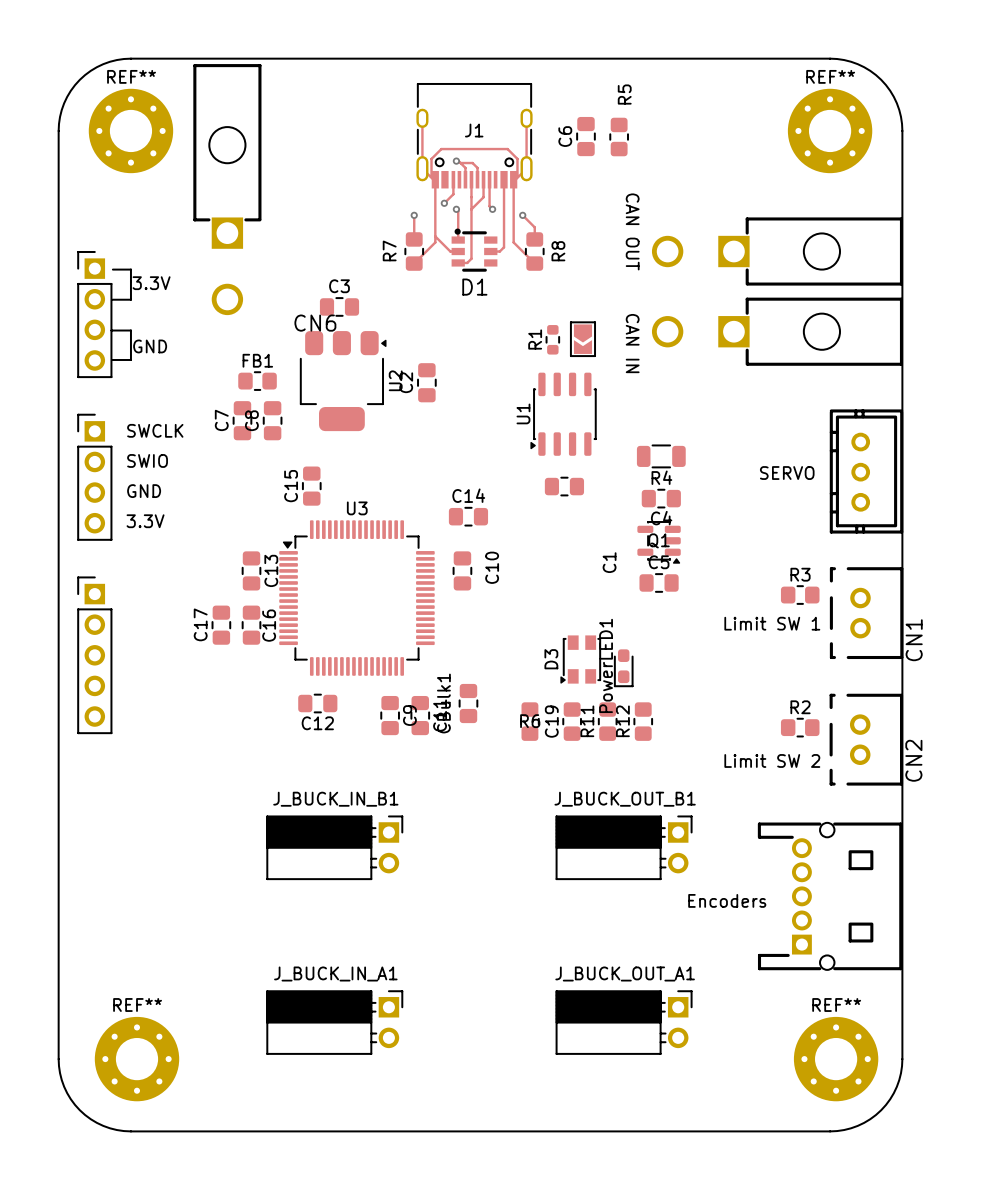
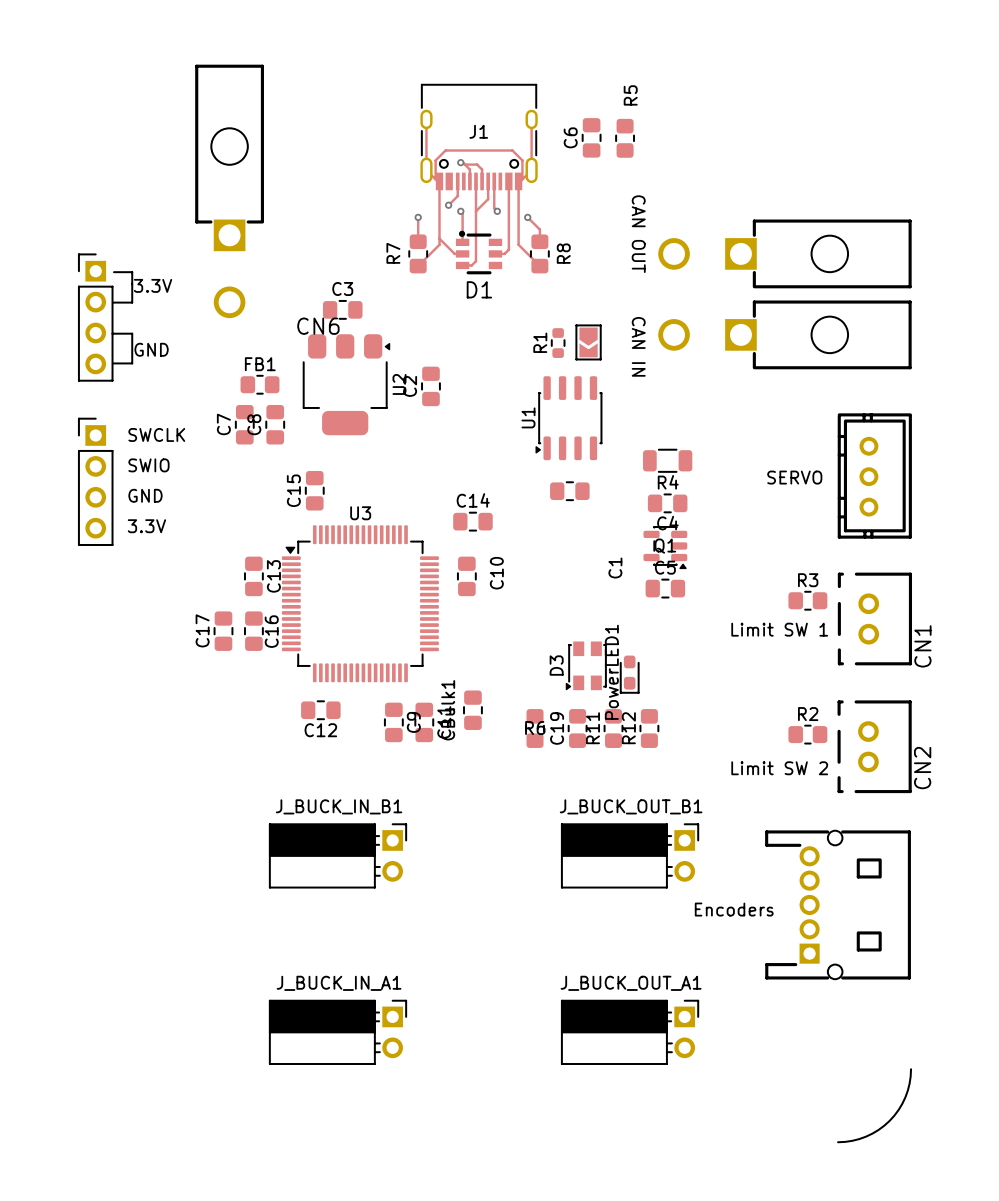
REF**: (130, 130) -> none
REF**: (830, 130) -> none
part: (94, 655) -> none
REF**: (137, 1059) -> none
REF**: (836, 1059) -> none
board edge: (902, 1059) (902, 130) (899, 109) (885, 85) (864, 67) (851, 61) (830, 58) (130, 58) (103, 64) (85, 75) (70, 90) (64, 103) (58, 130) (58, 1059) (61, 1080) (70, 1099) (85, 1114) (96, 1122) (109, 1128) (130, 1131) (830, 1131) -> none

